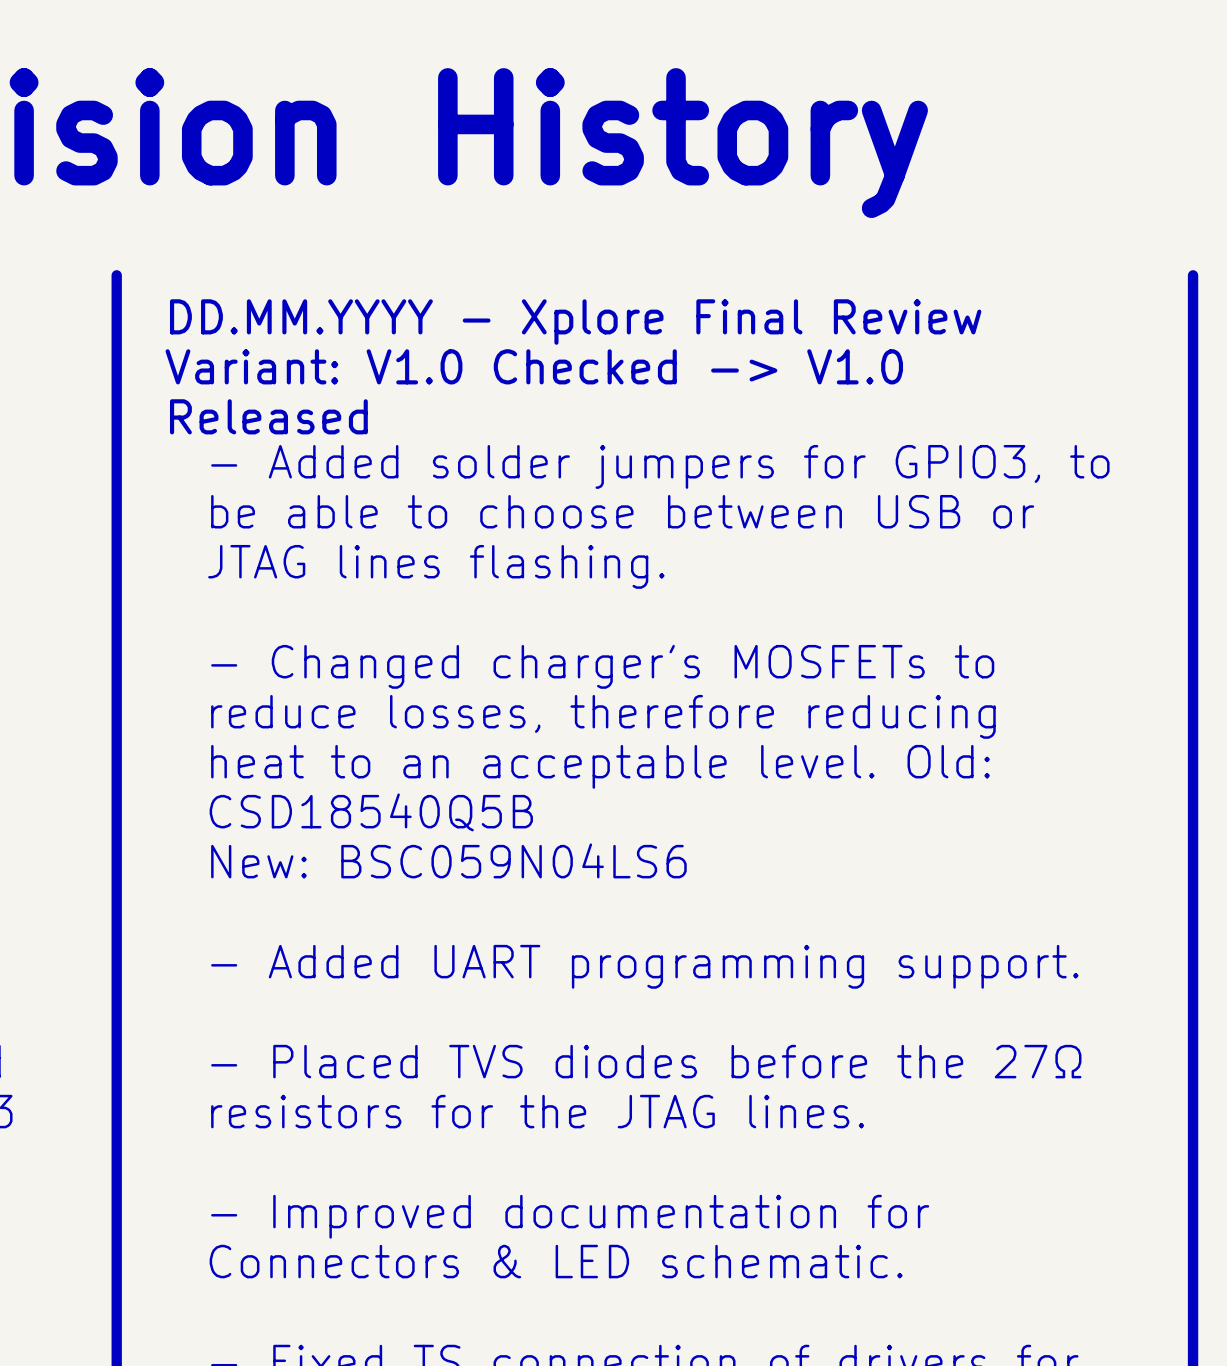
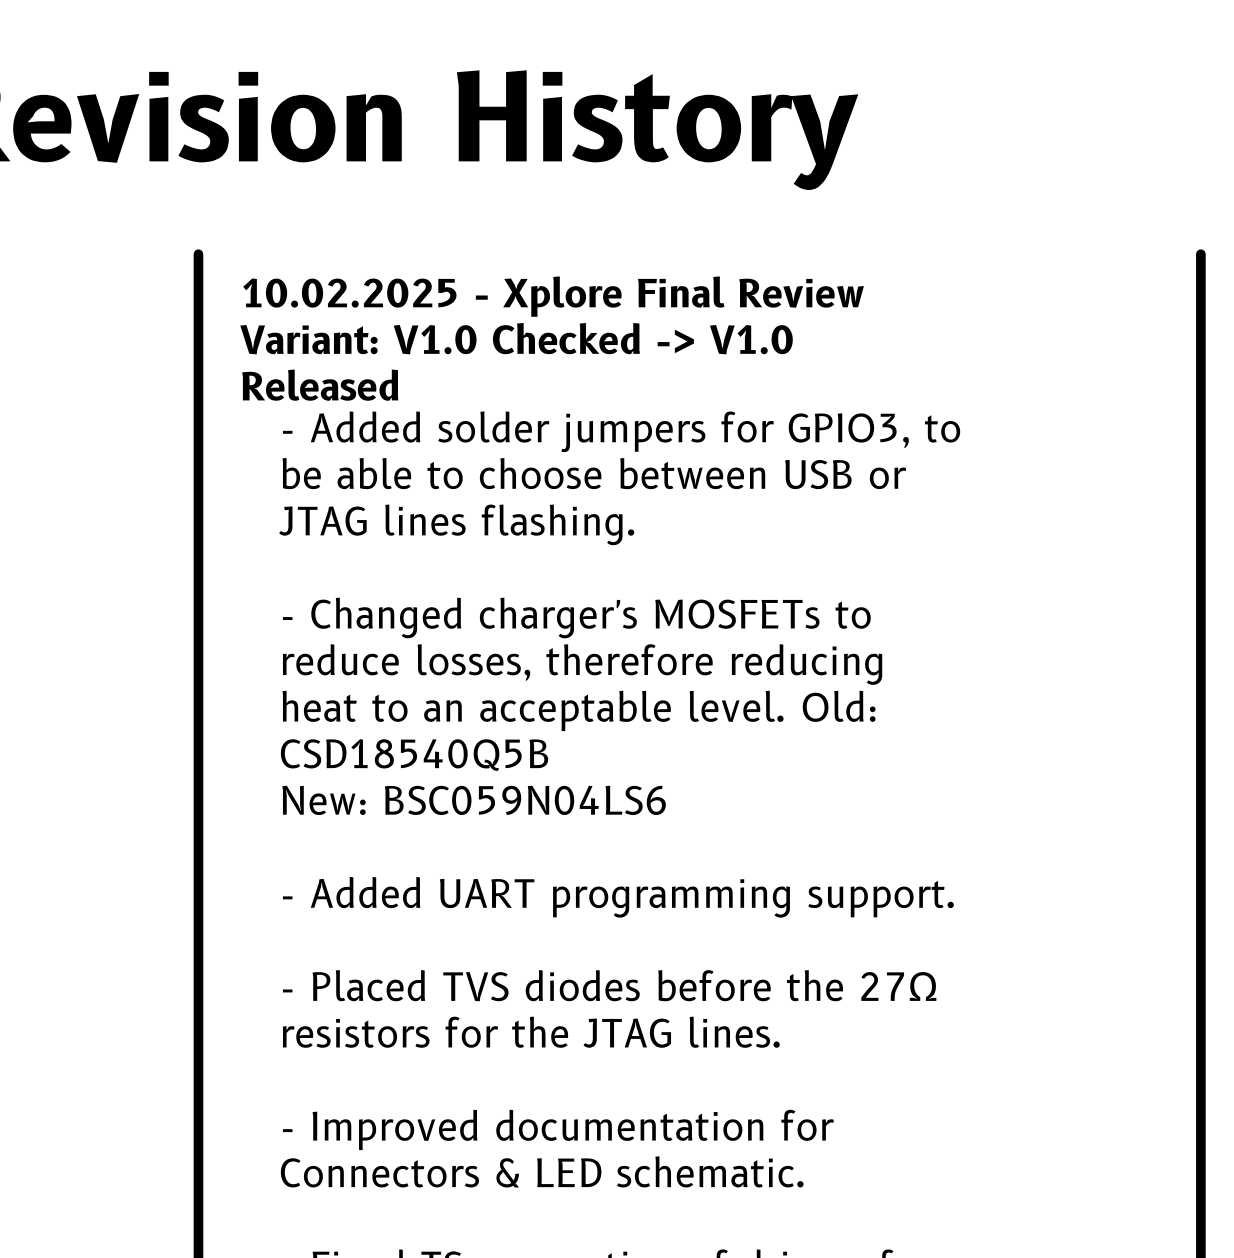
text: DD.MM.YYYY - Xplore Final Review (575, 322) -> 10.02.2025 - Xplore Final Review (553, 296)

